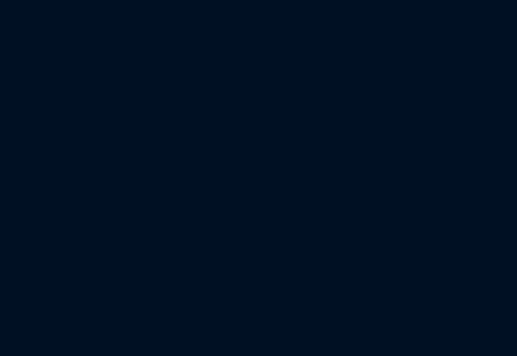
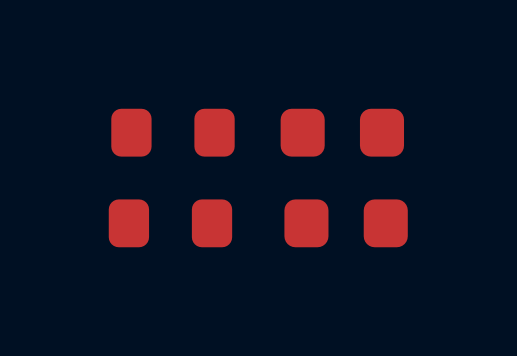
part: none -> (172, 132)
part: none -> (342, 132)
part: none -> (170, 223)
part: none -> (346, 223)

